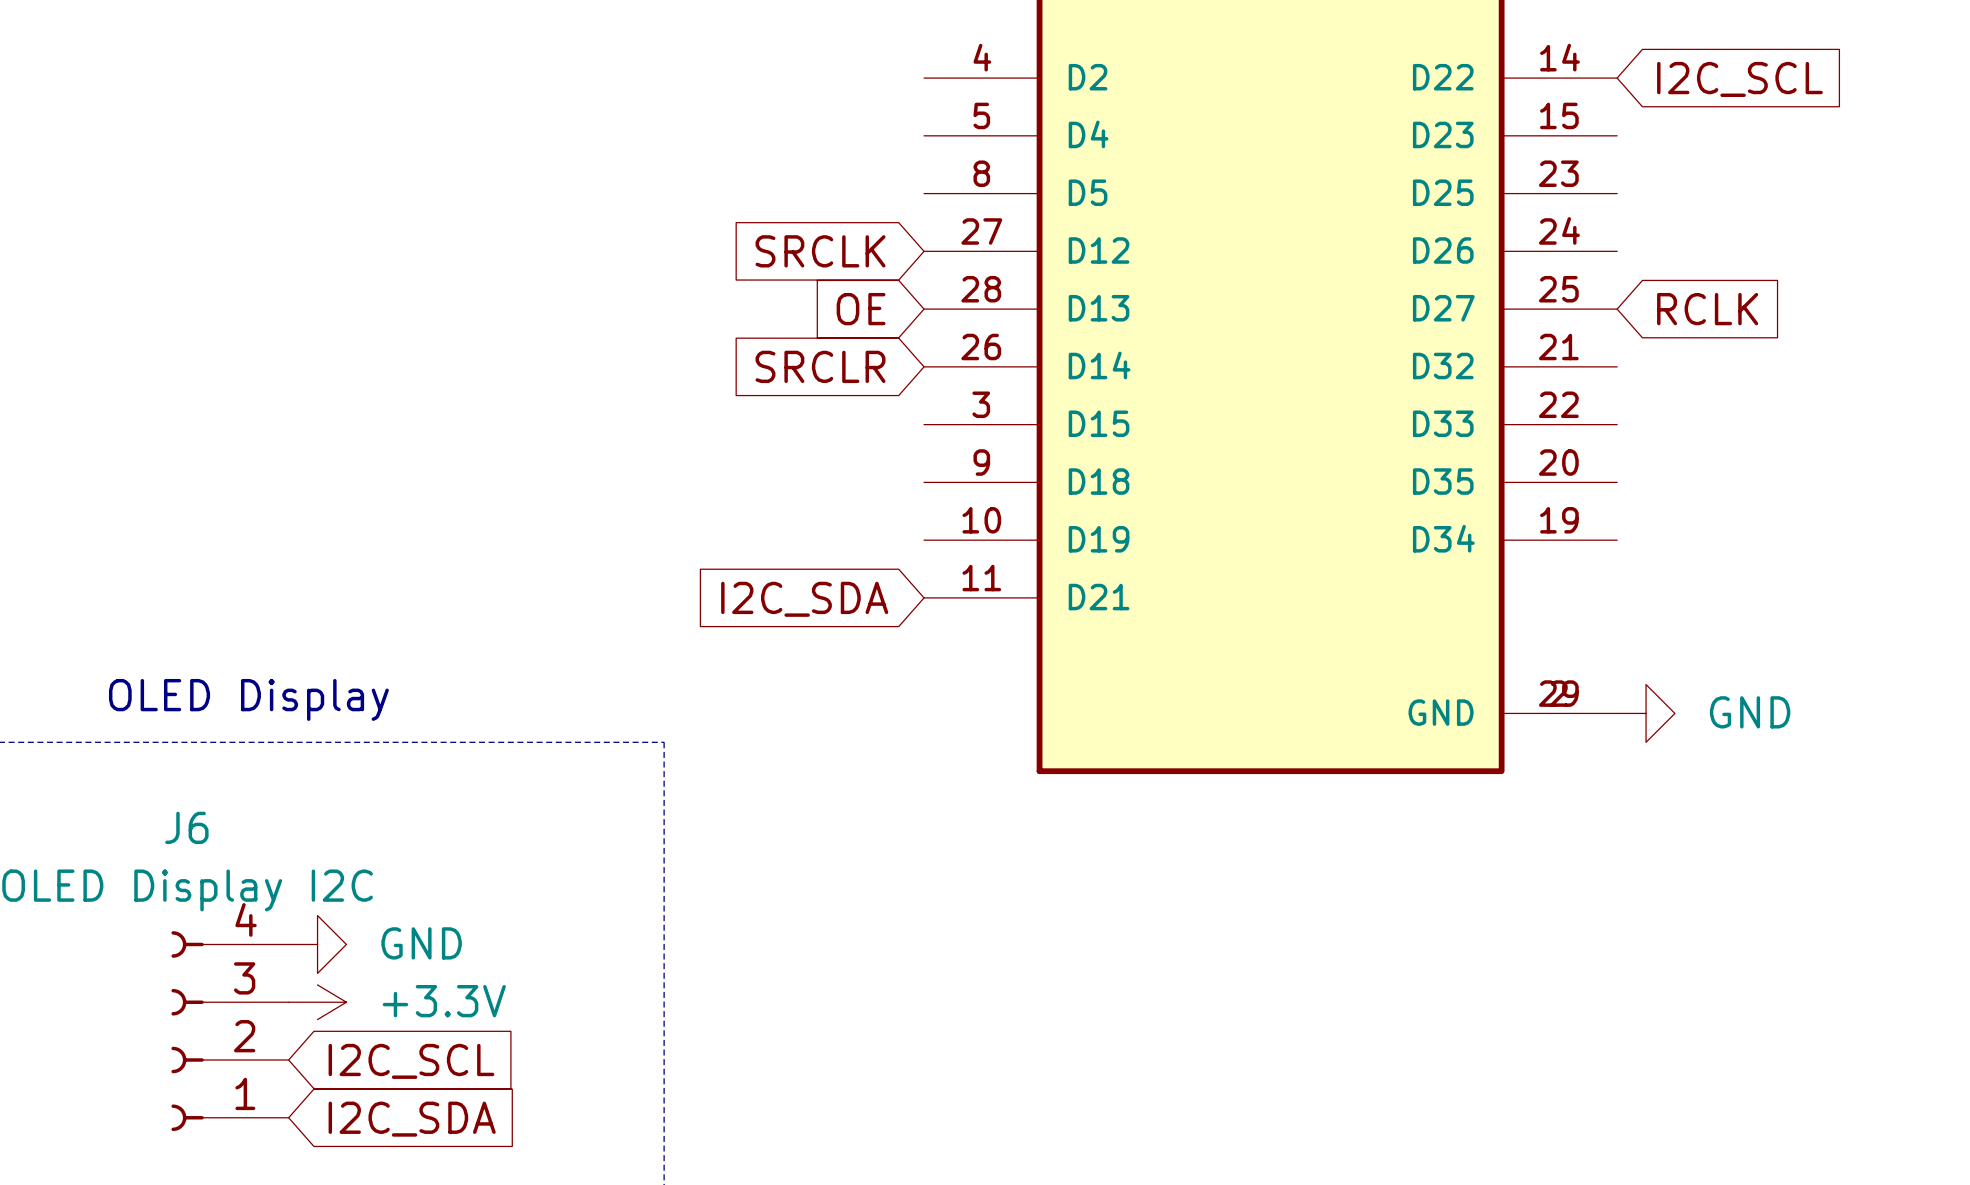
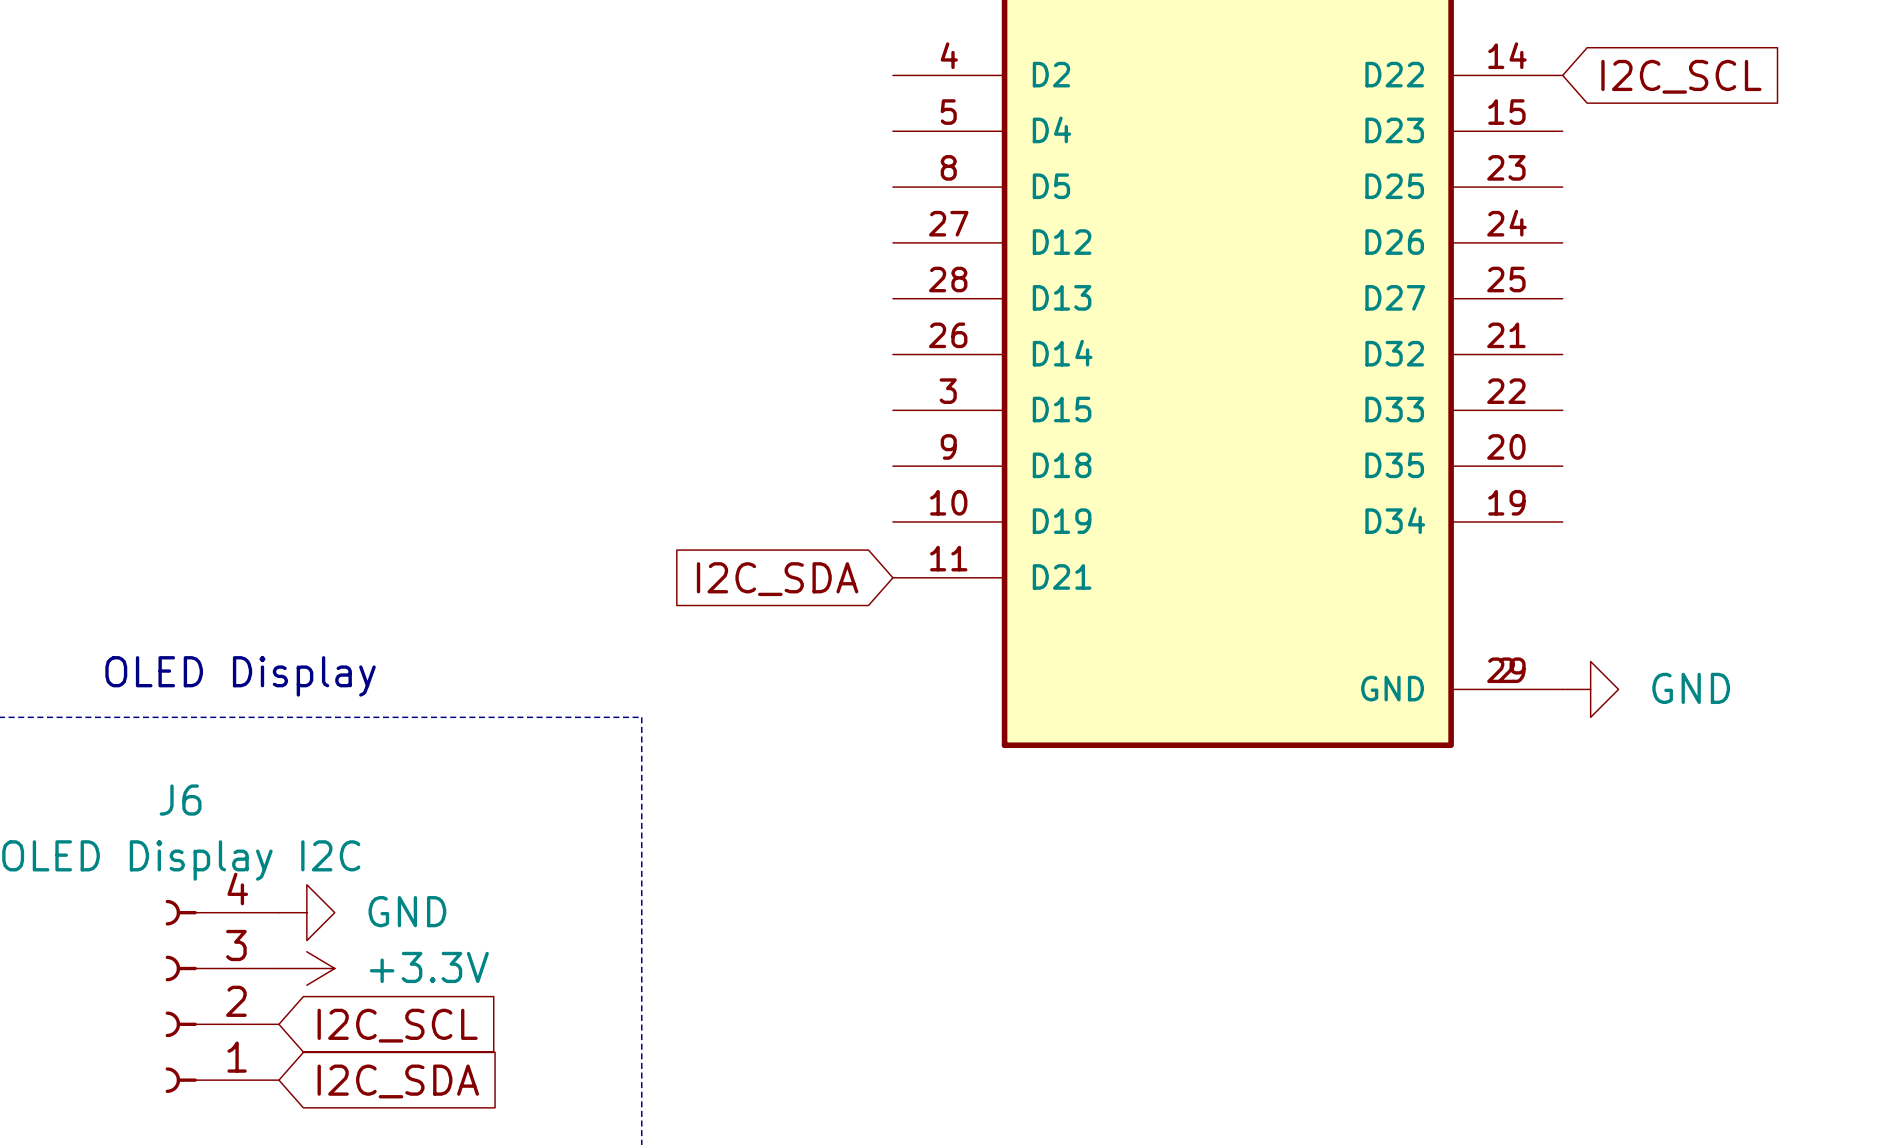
global label: SRCLK (820, 251) -> none
global label: OE (861, 309) -> none
global label: RCLK (1707, 309) -> none
global label: SRCLR (820, 366) -> none

